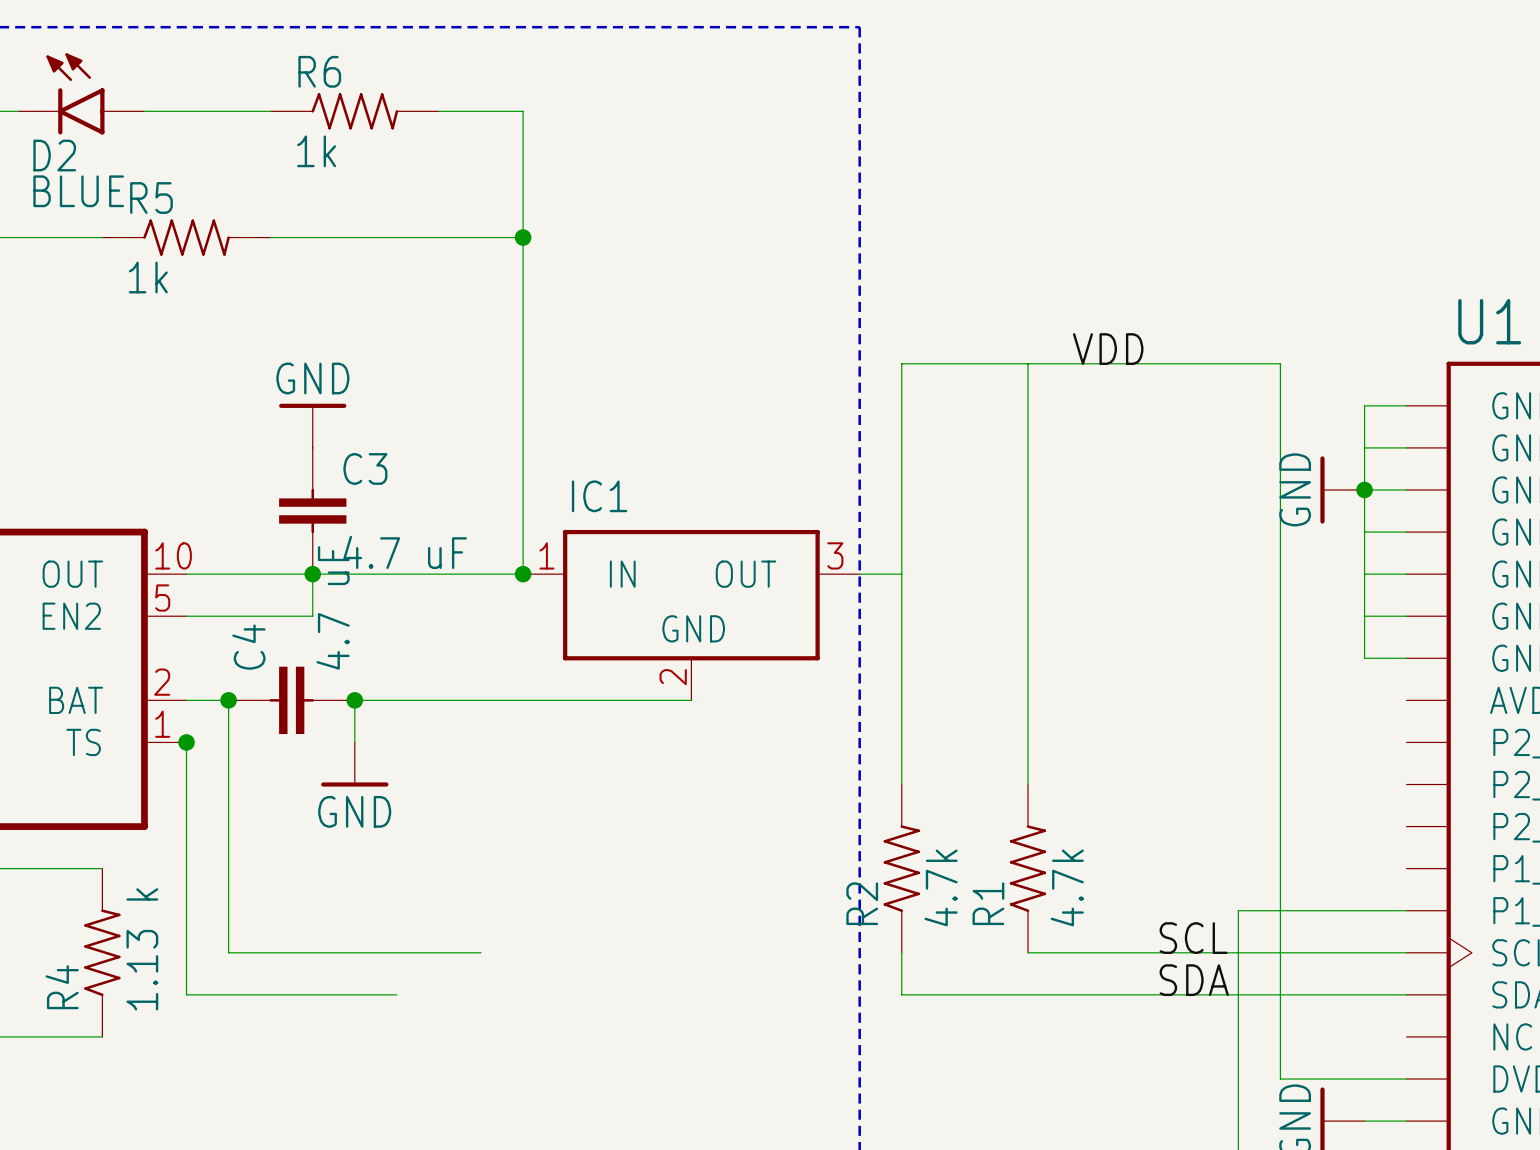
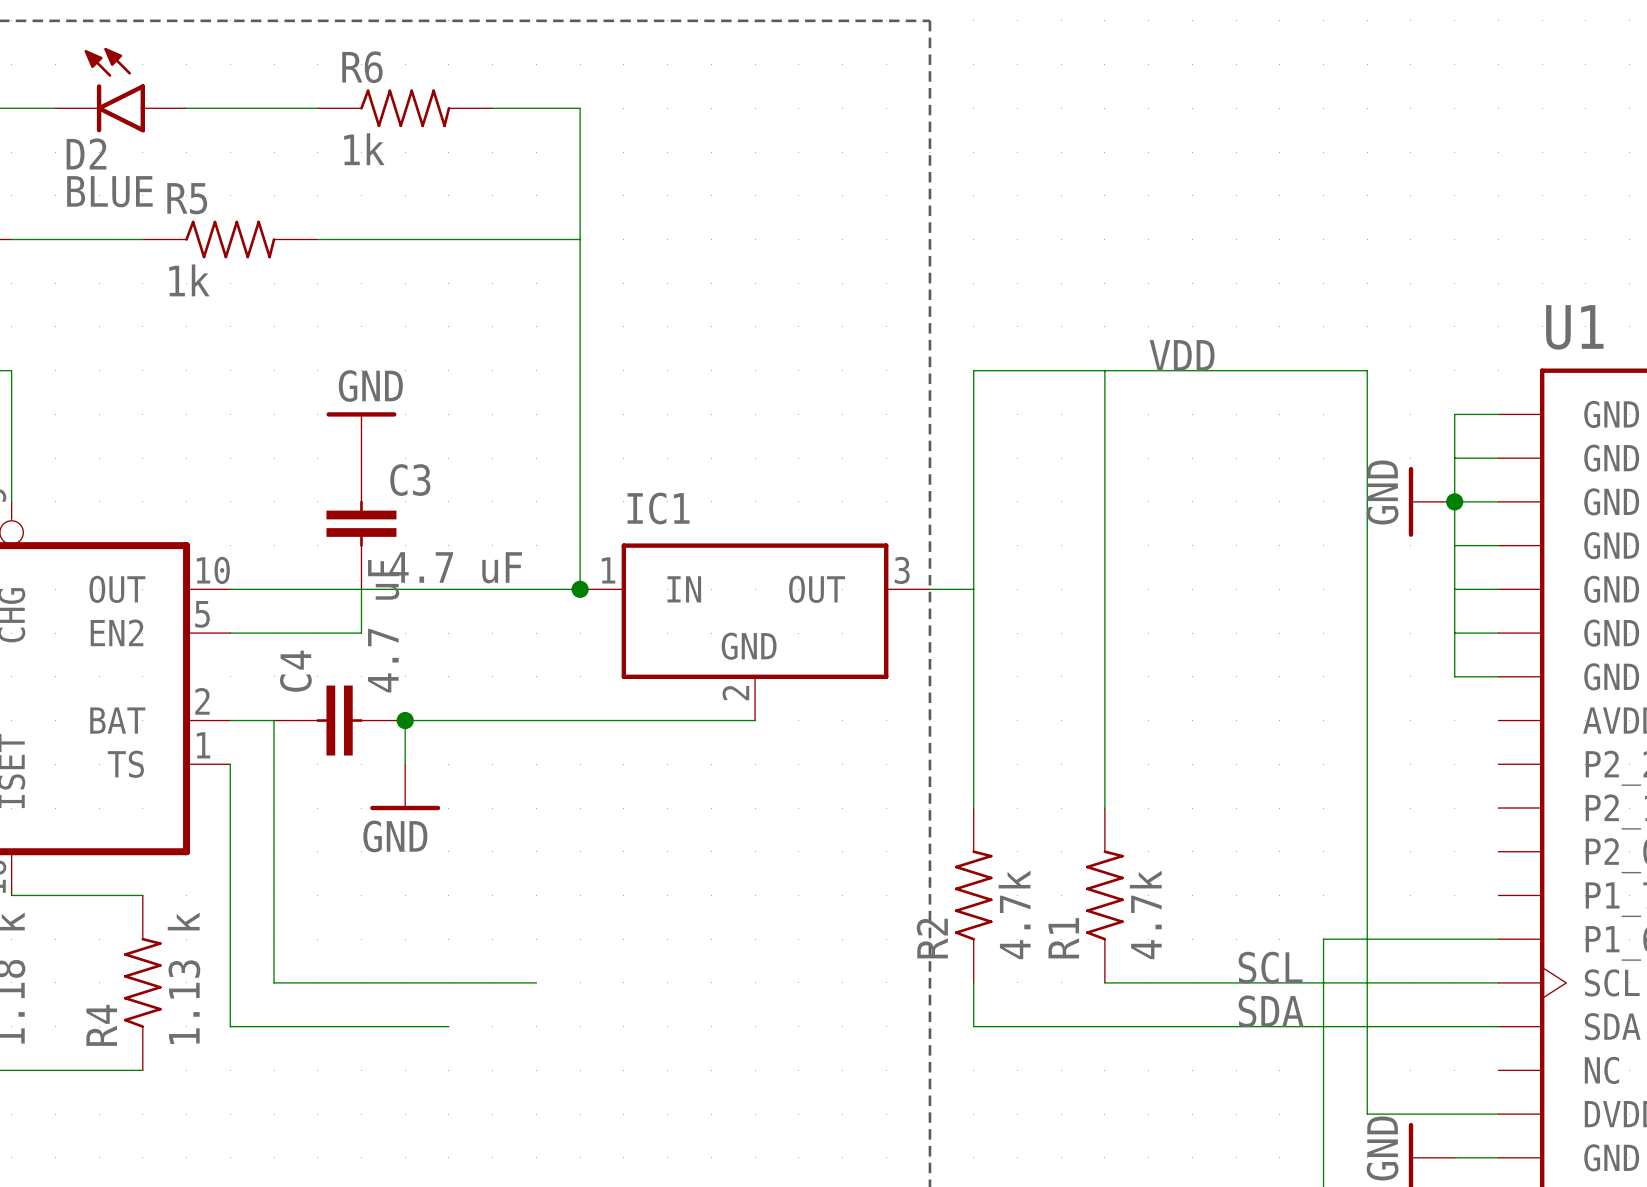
junction: (523, 237) -> none
junction: (312, 574) -> none
junction: (228, 700) -> none
junction: (186, 742) -> none

